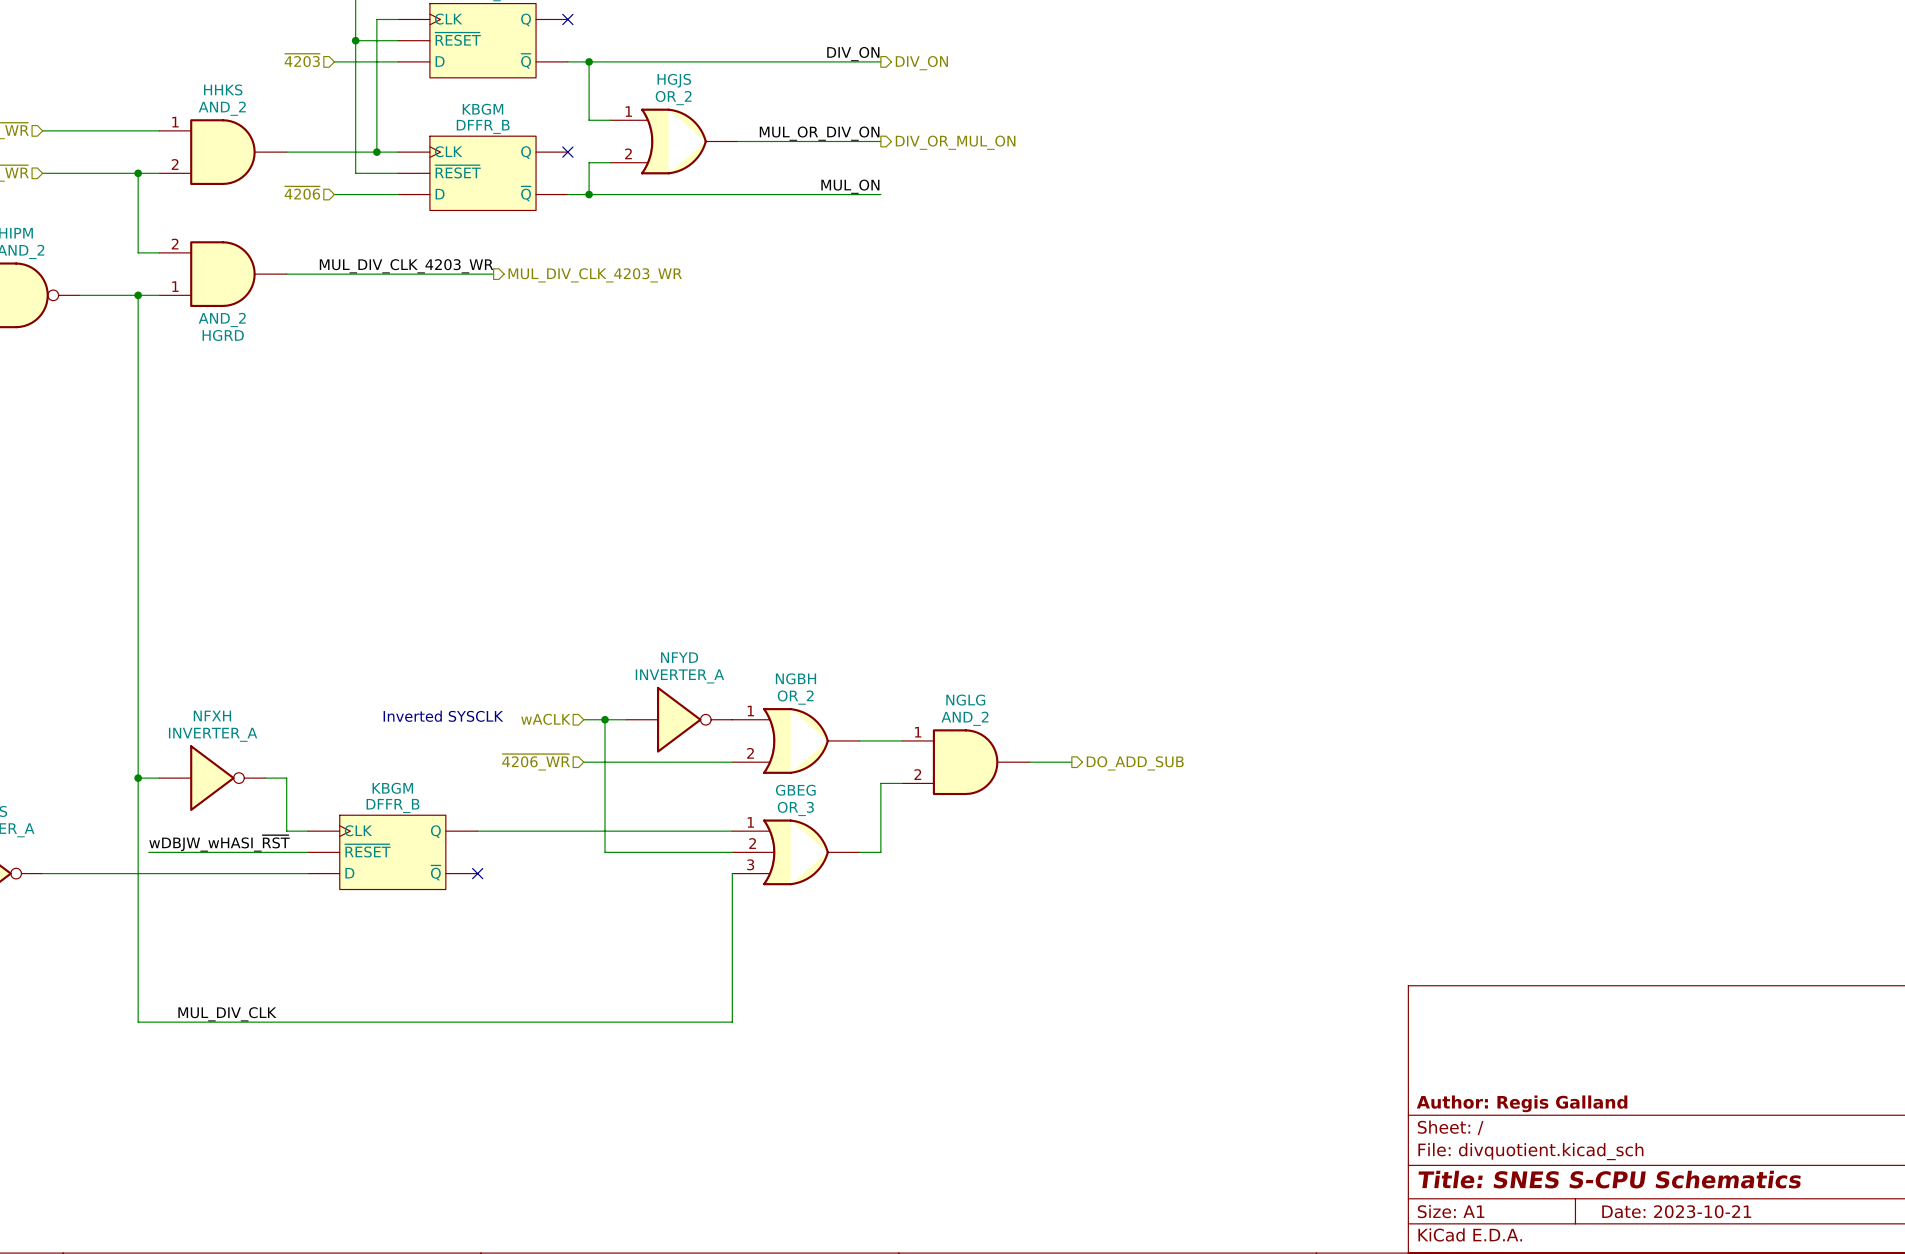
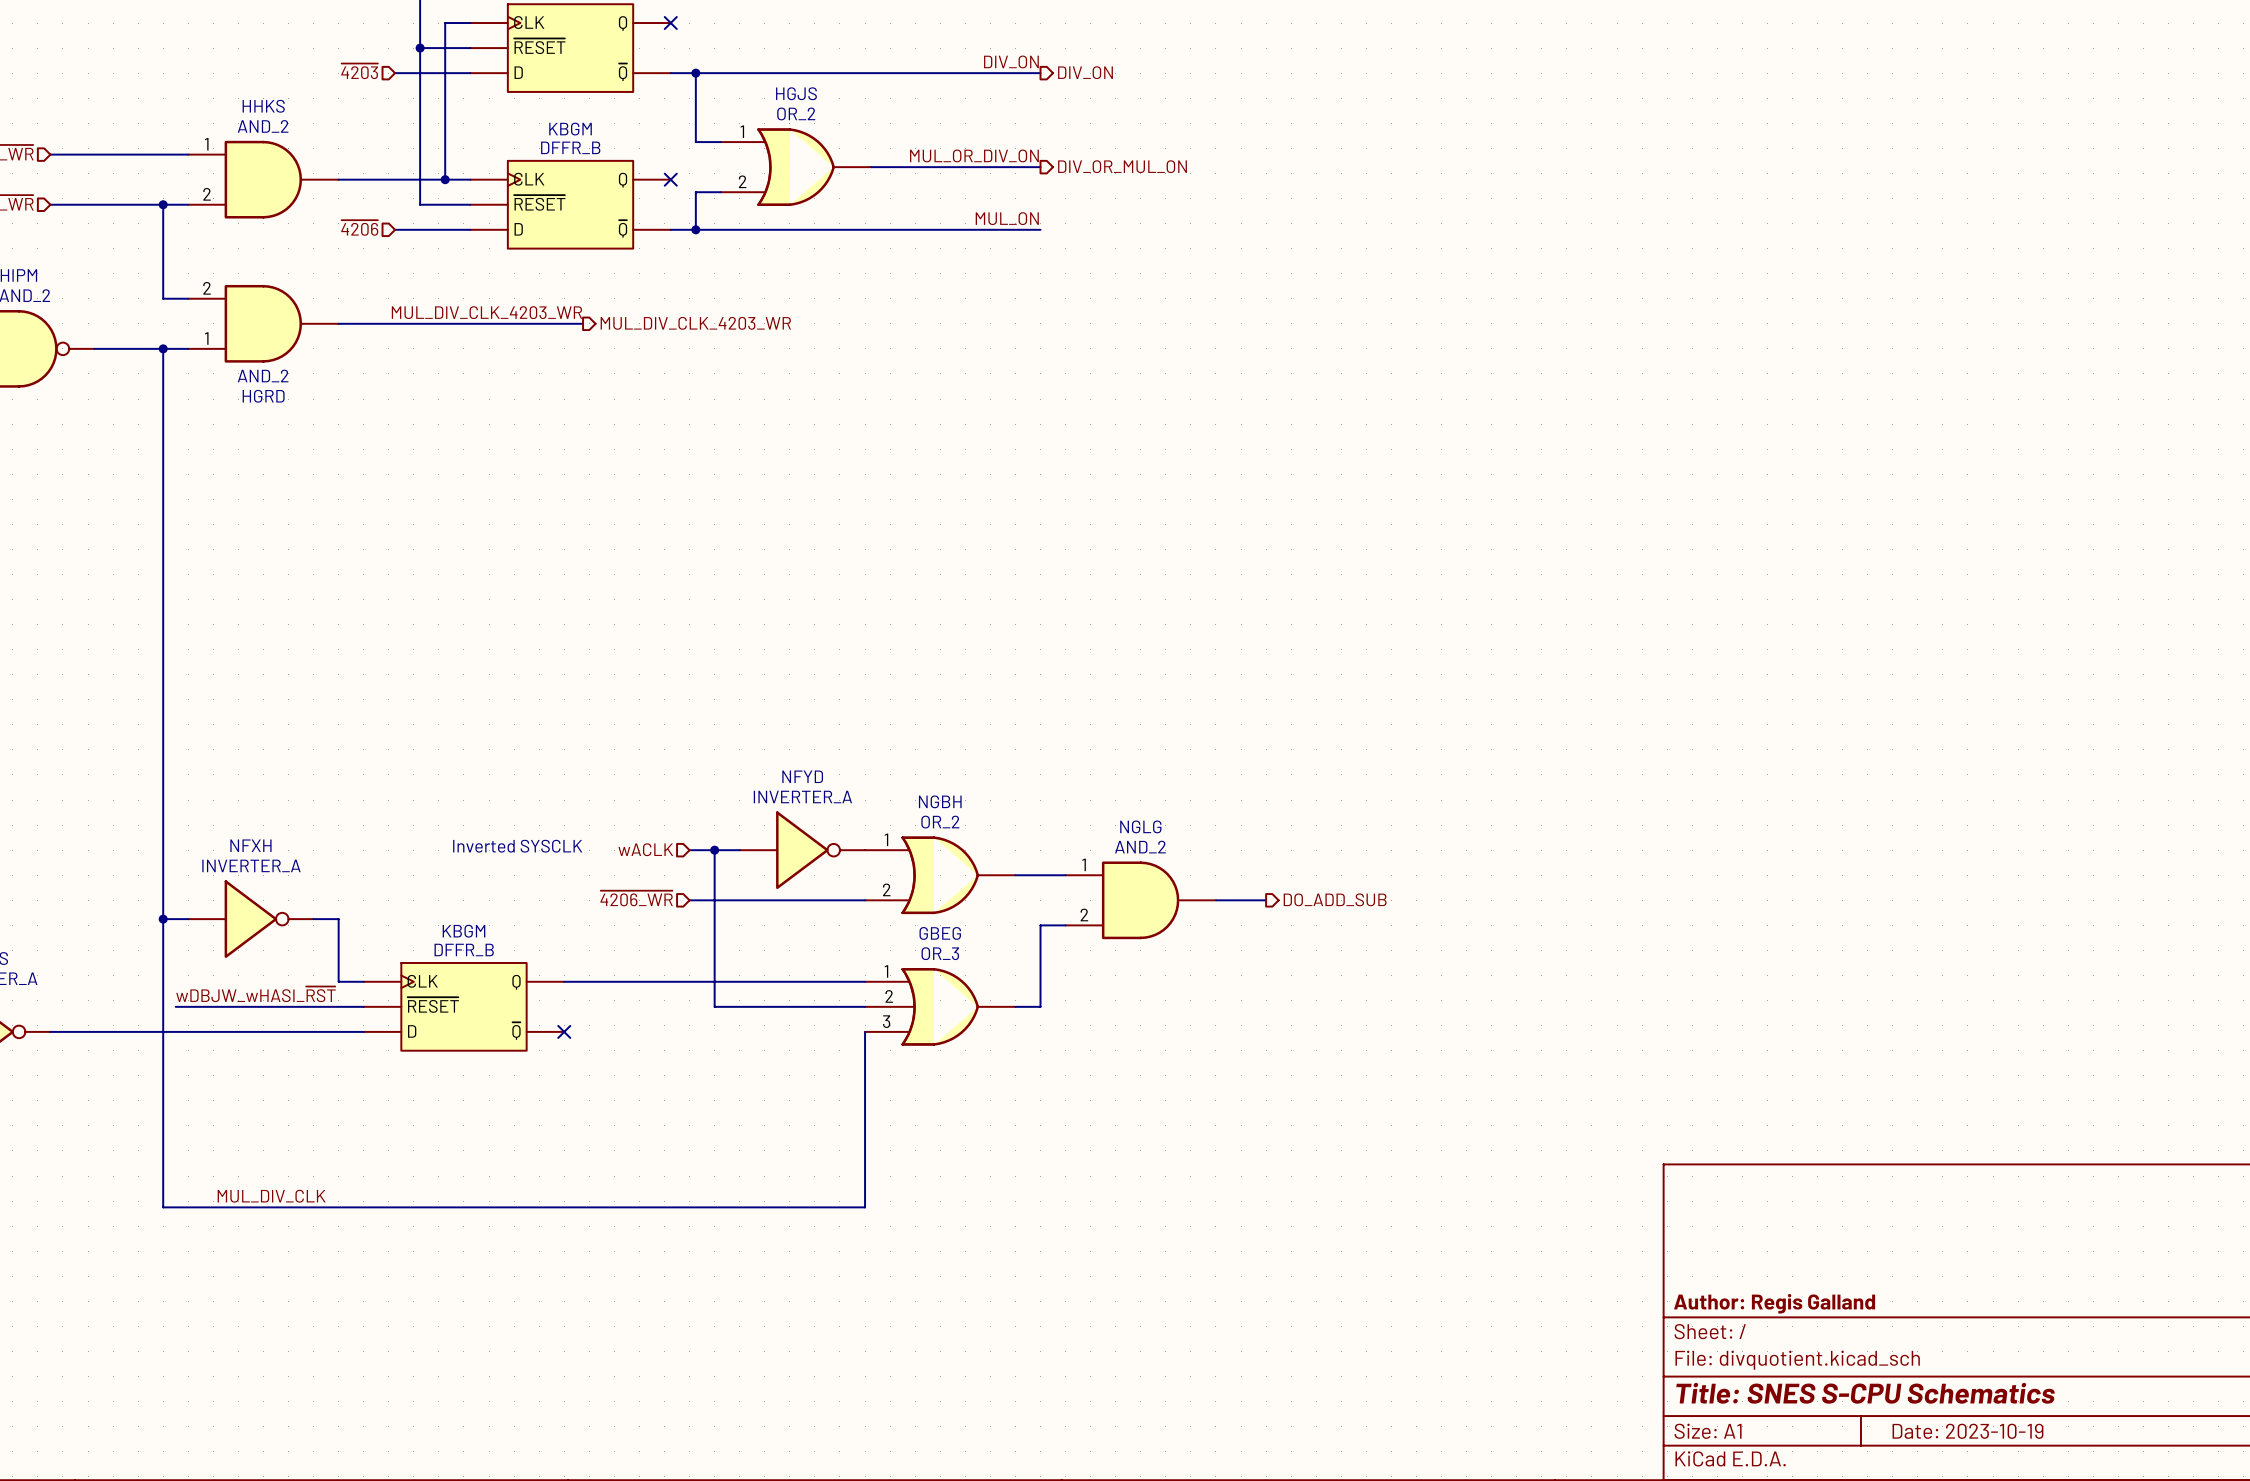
title block: Date: 2023-10-21 (1676, 1211) -> Date: 2023-10-19 (1967, 1431)

